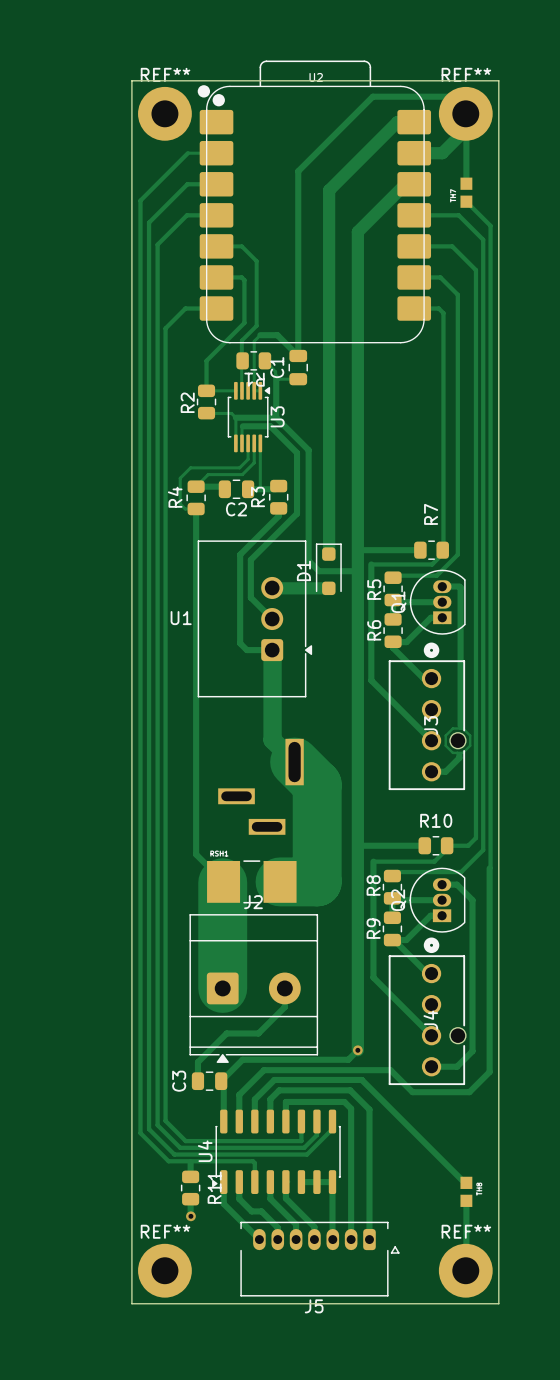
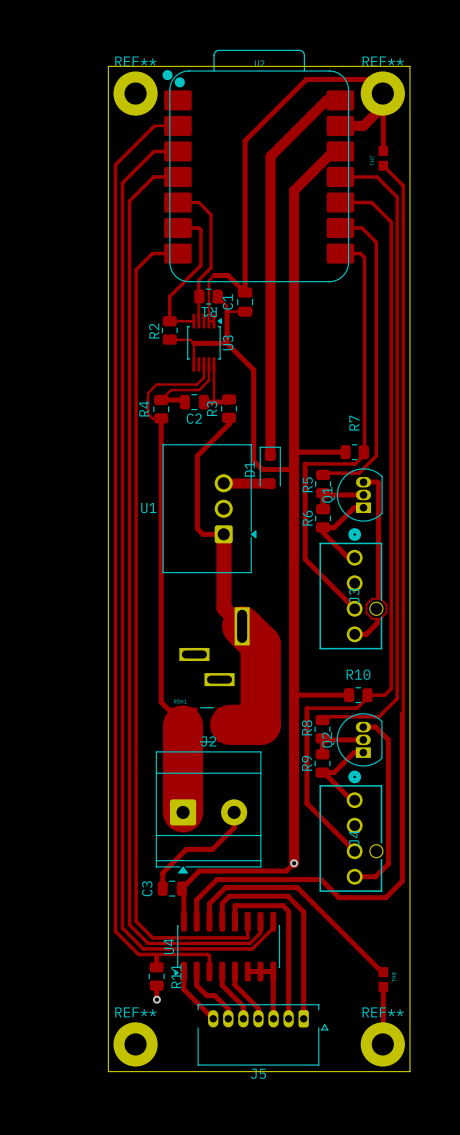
track: (241, 443) (242, 426) (270, 426) (297, 452) (297, 513) (250, 559) (250, 597) (272, 619) -> none

